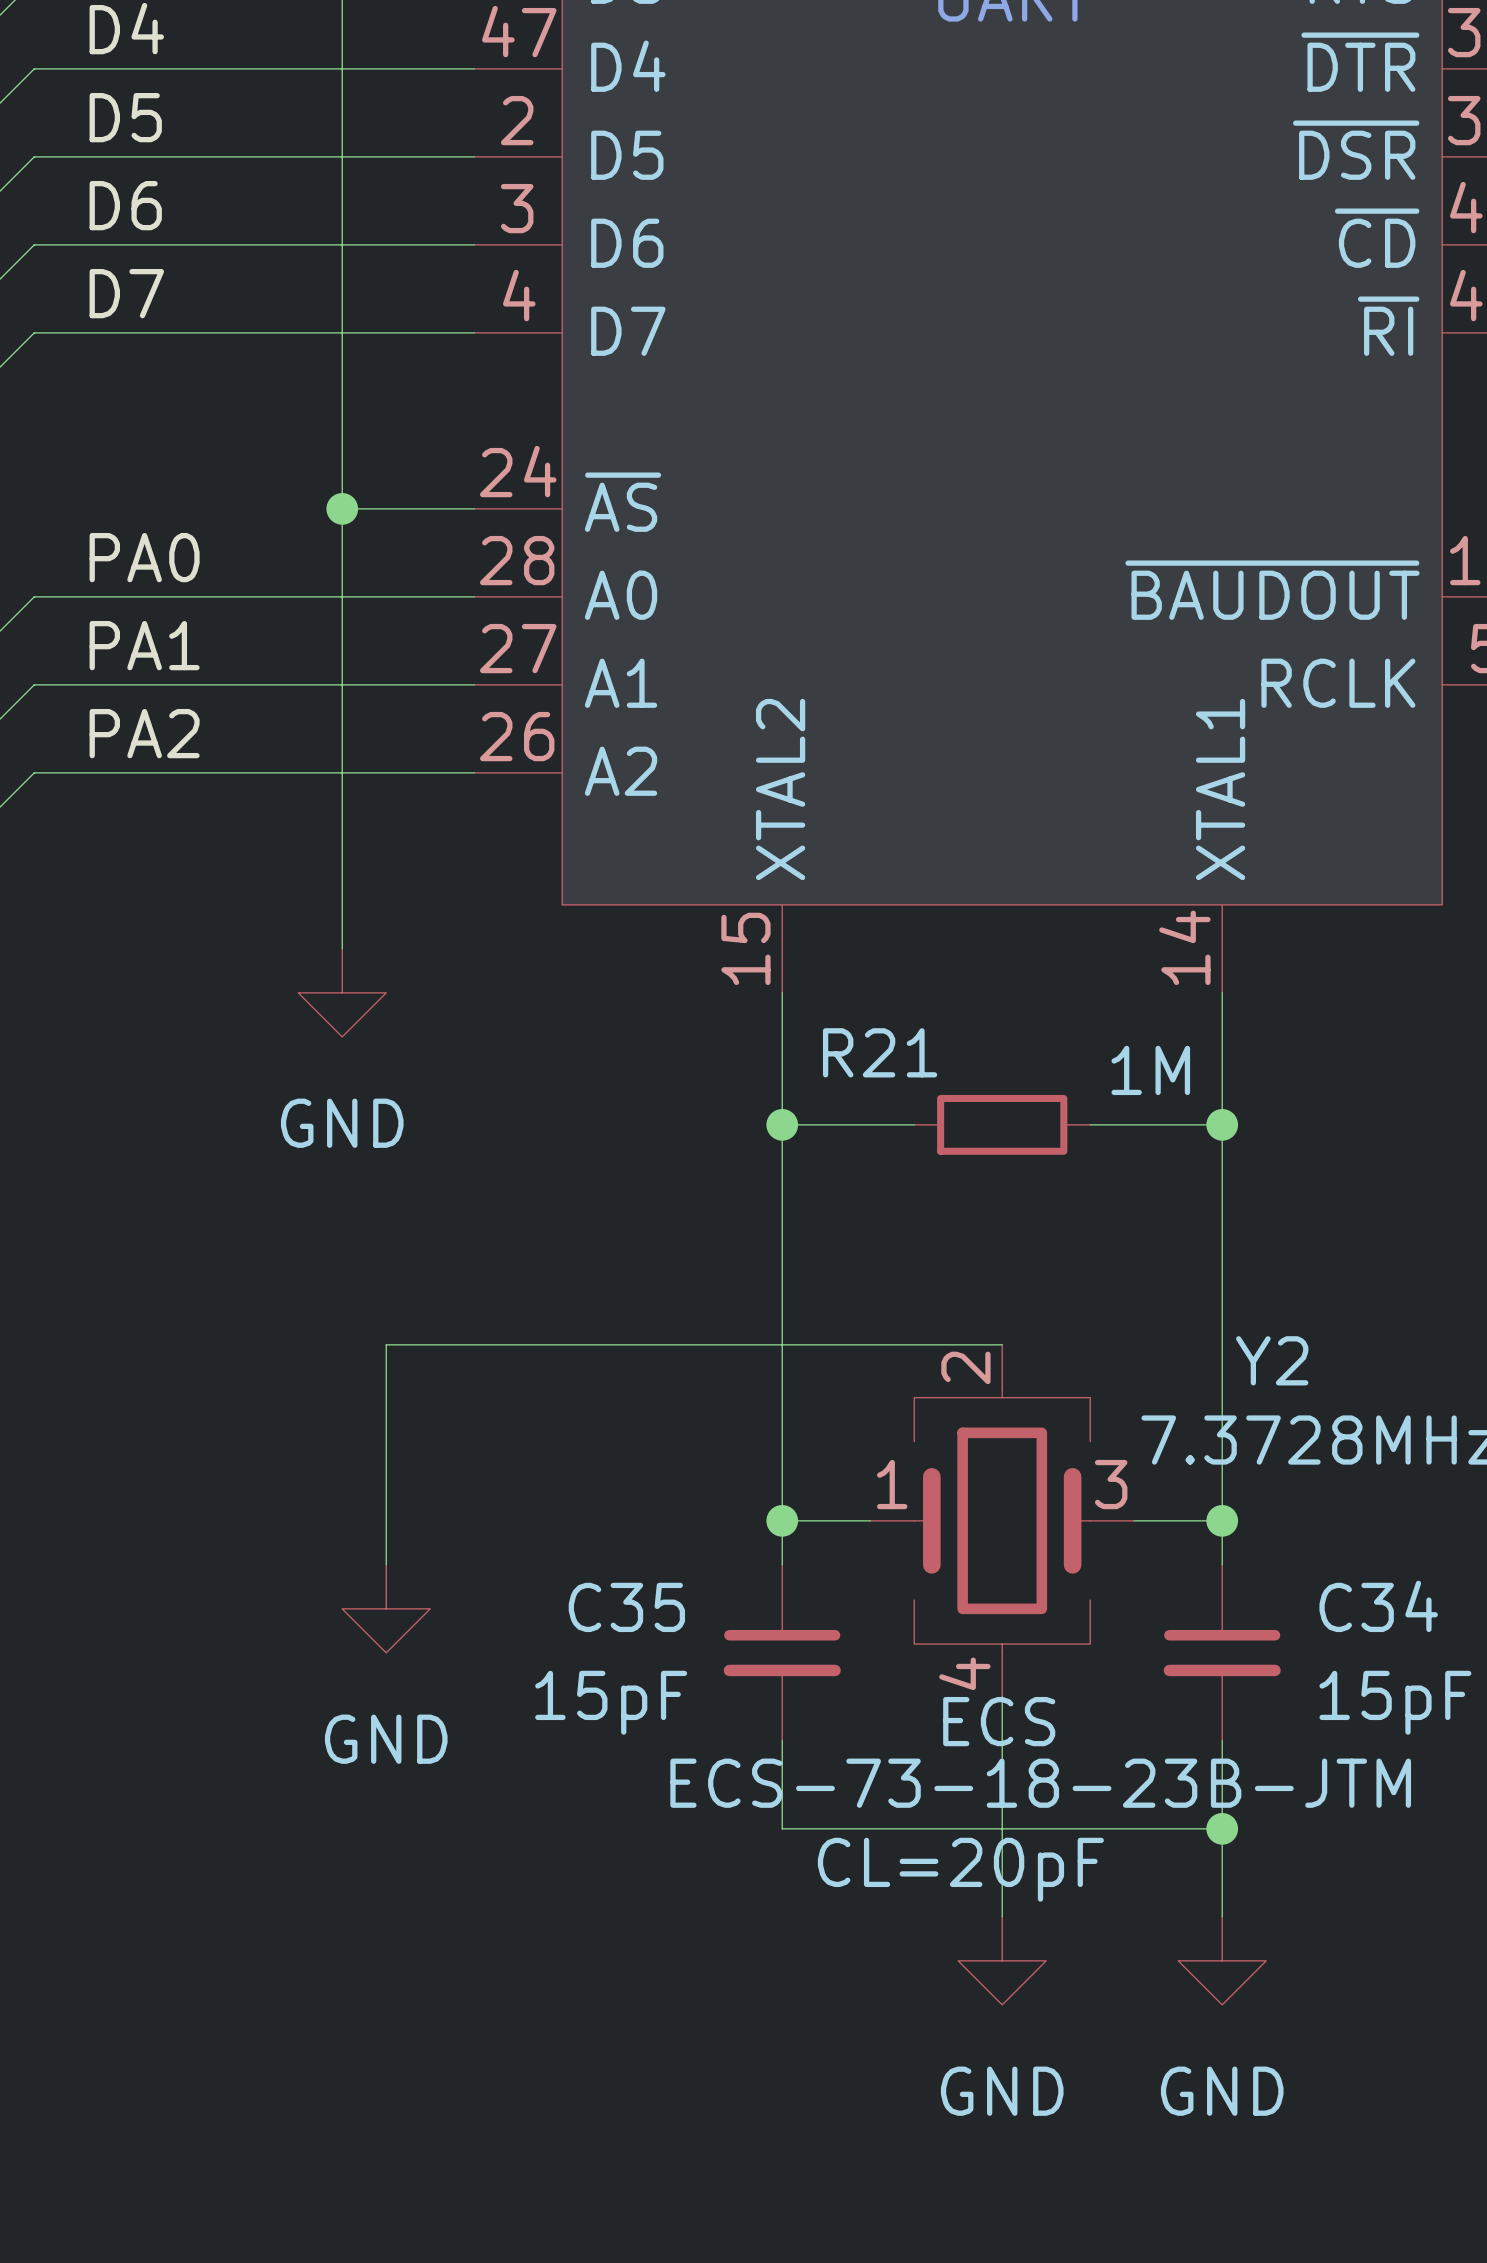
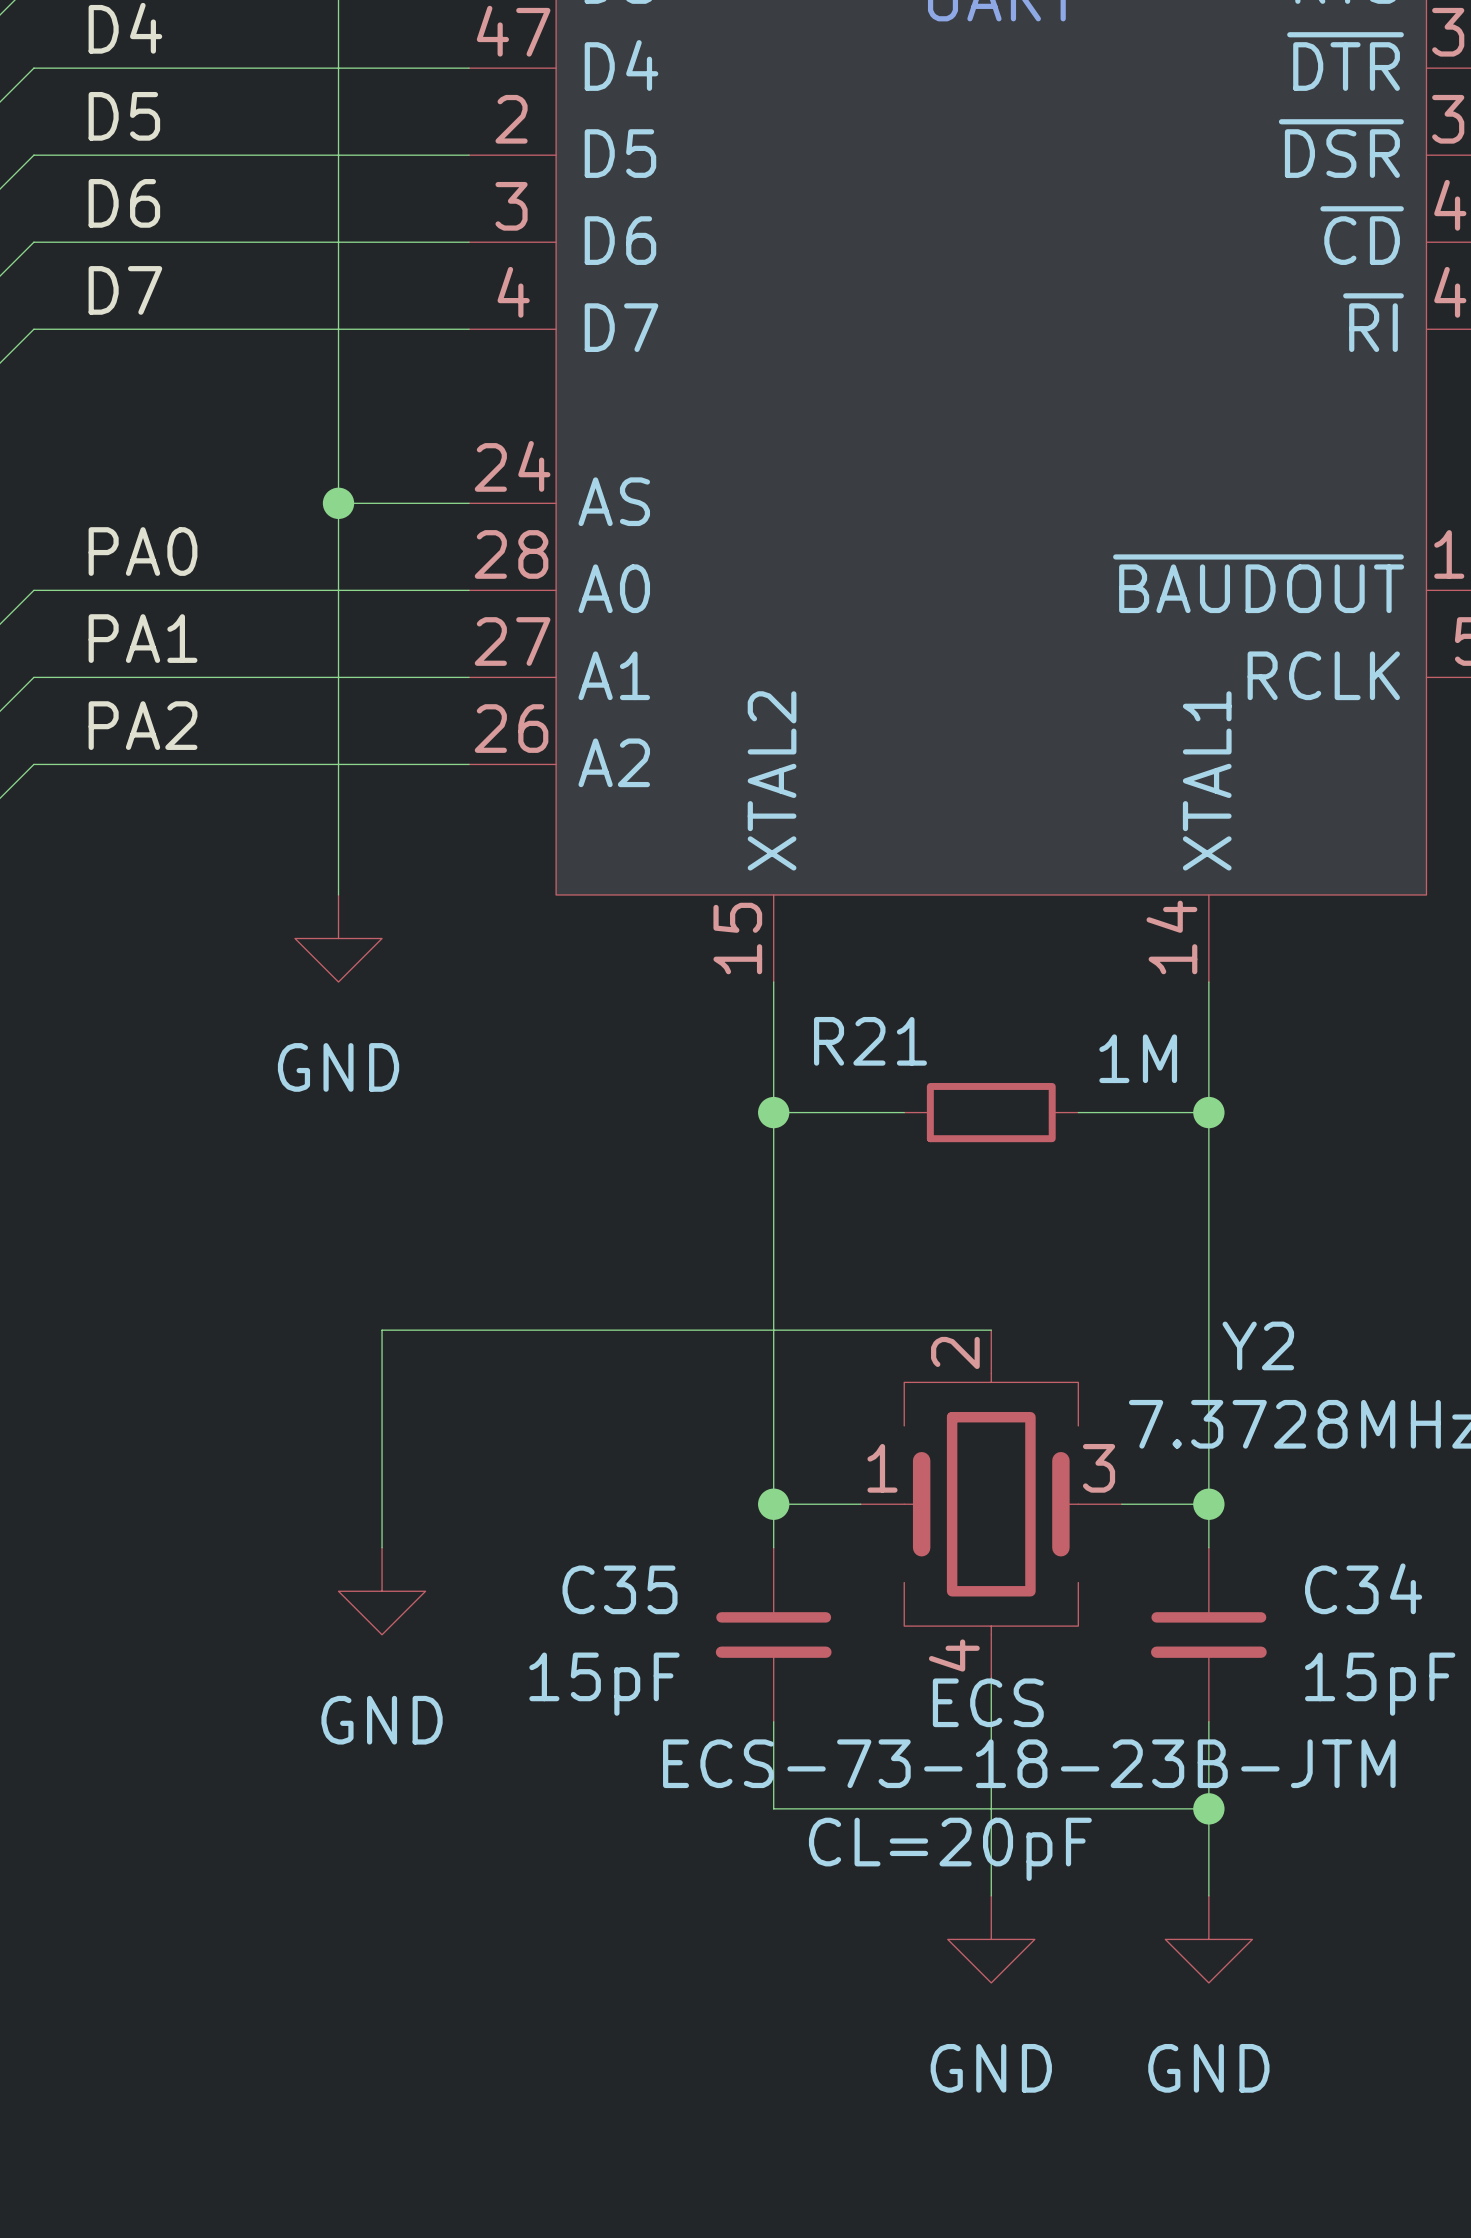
part pin name: ~{AS} (623, 502) -> AS (614, 501)
power symbol position: GND (342, 992) -> GND (338, 938)

